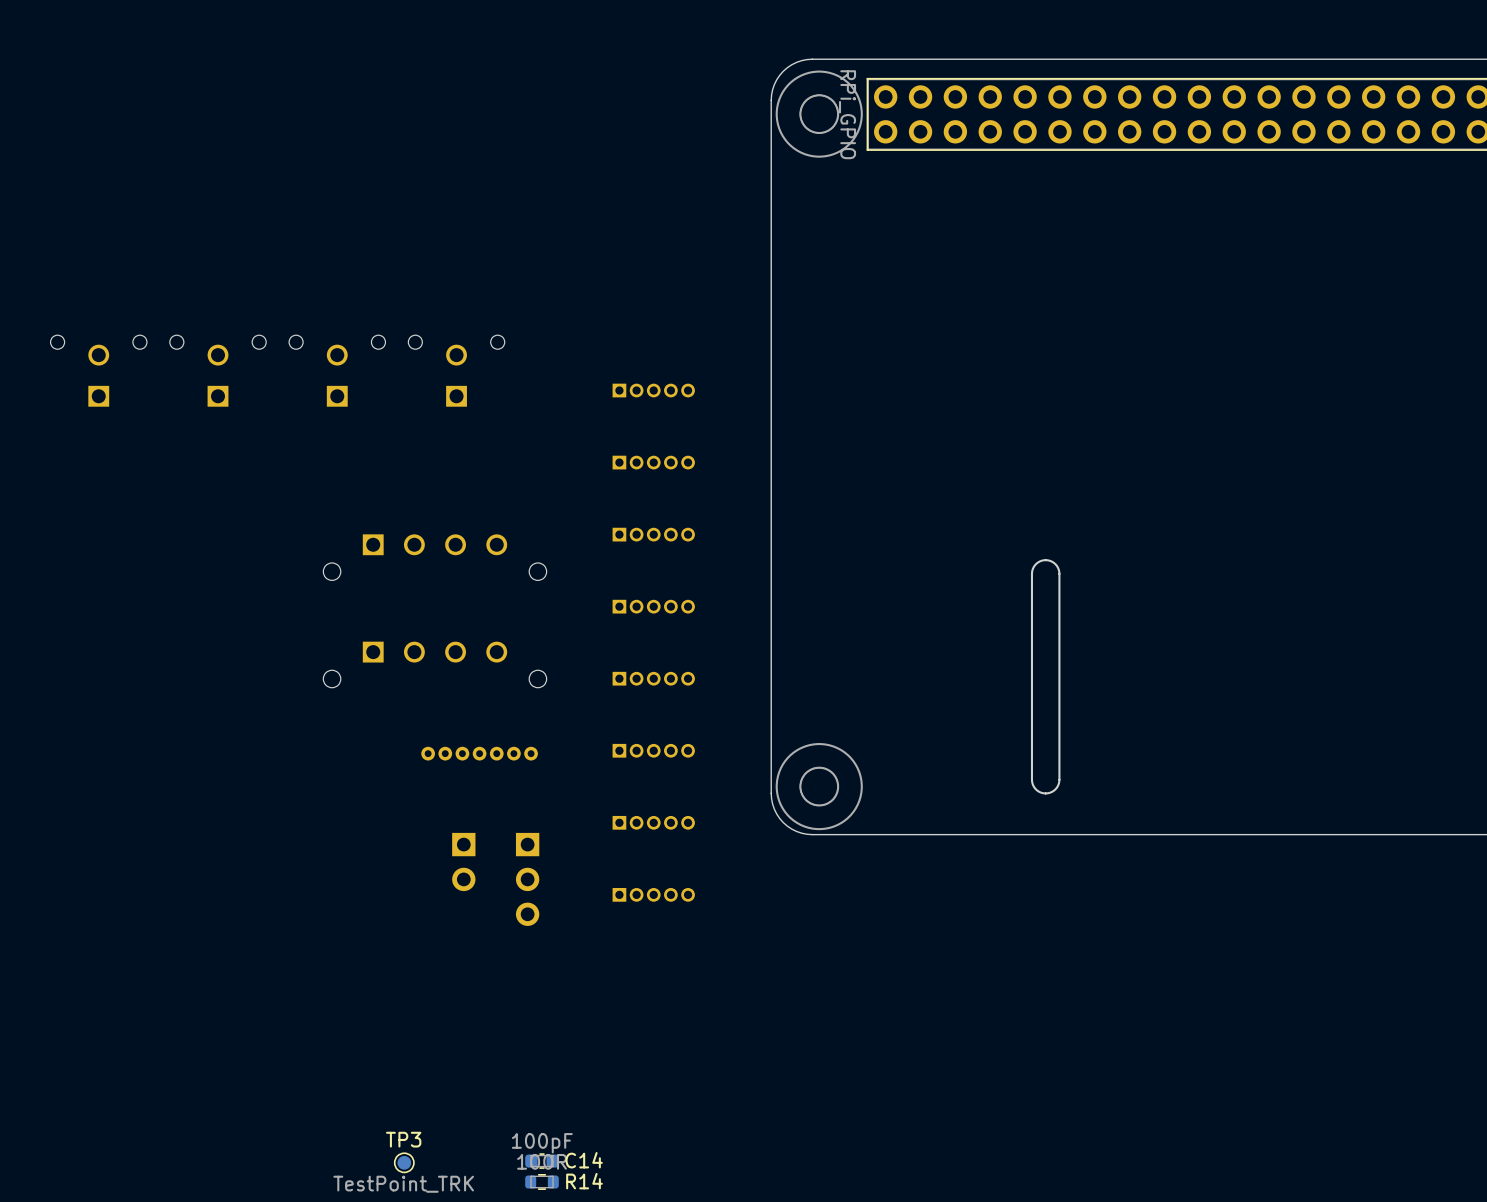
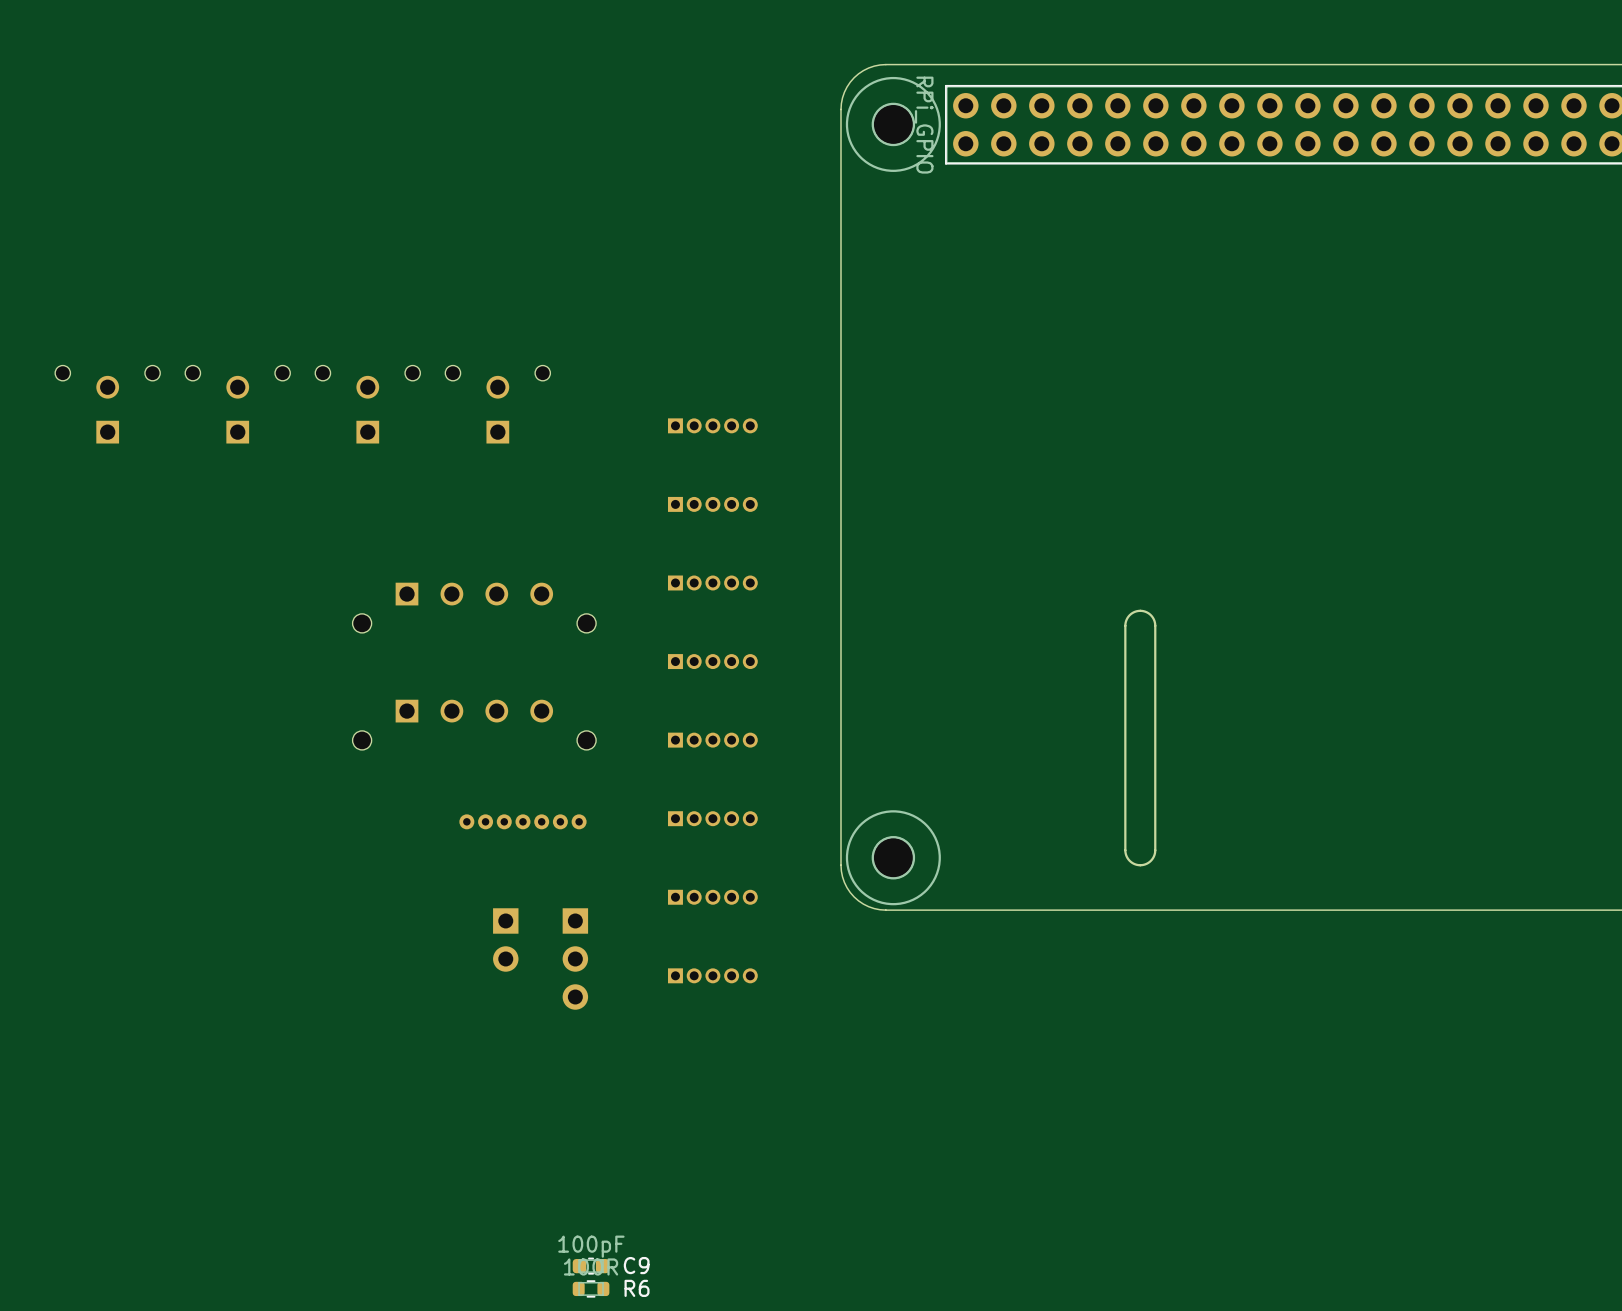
C14 name: C14 (584, 1160) -> C9 (636, 1265)
TP3: TestPoint_TRK (404, 1162) -> none
R14 name: R14 (584, 1181) -> R6 (637, 1288)

